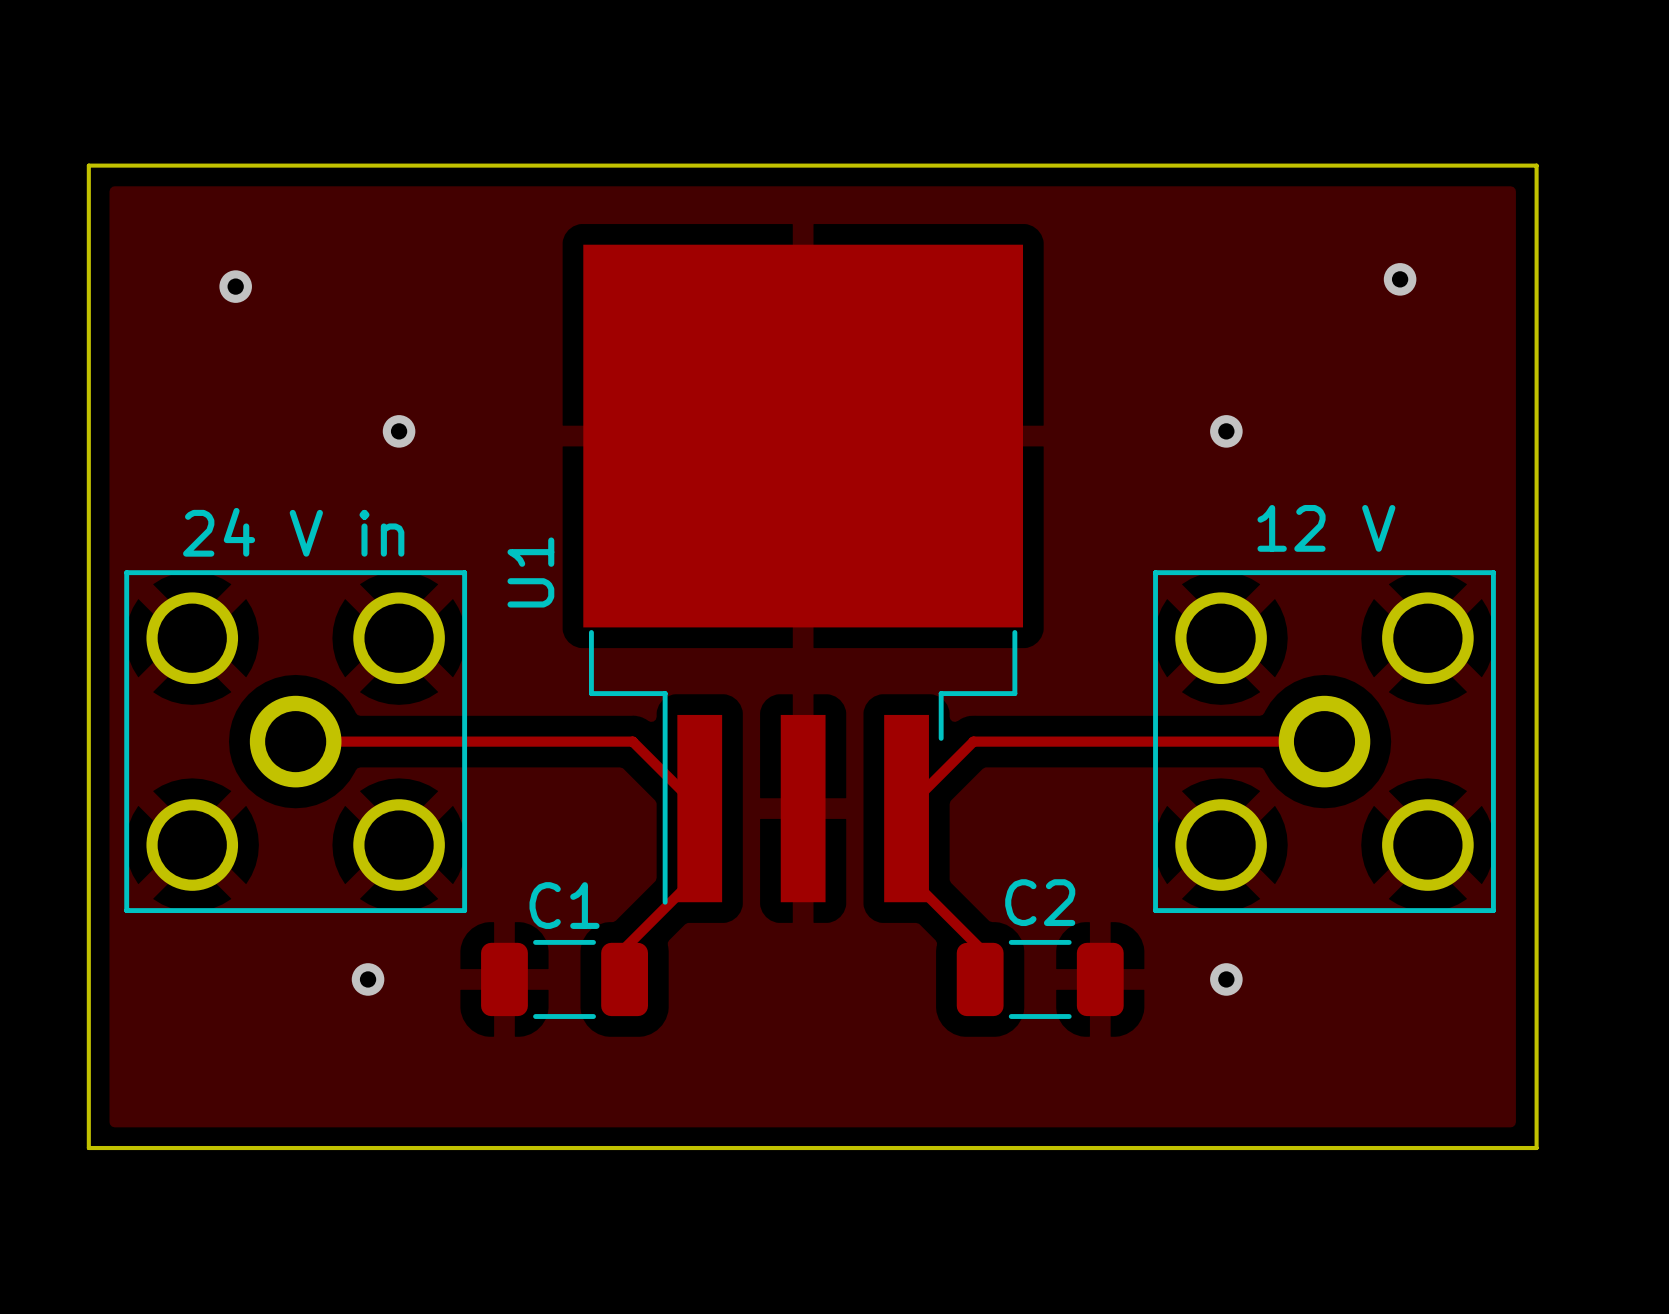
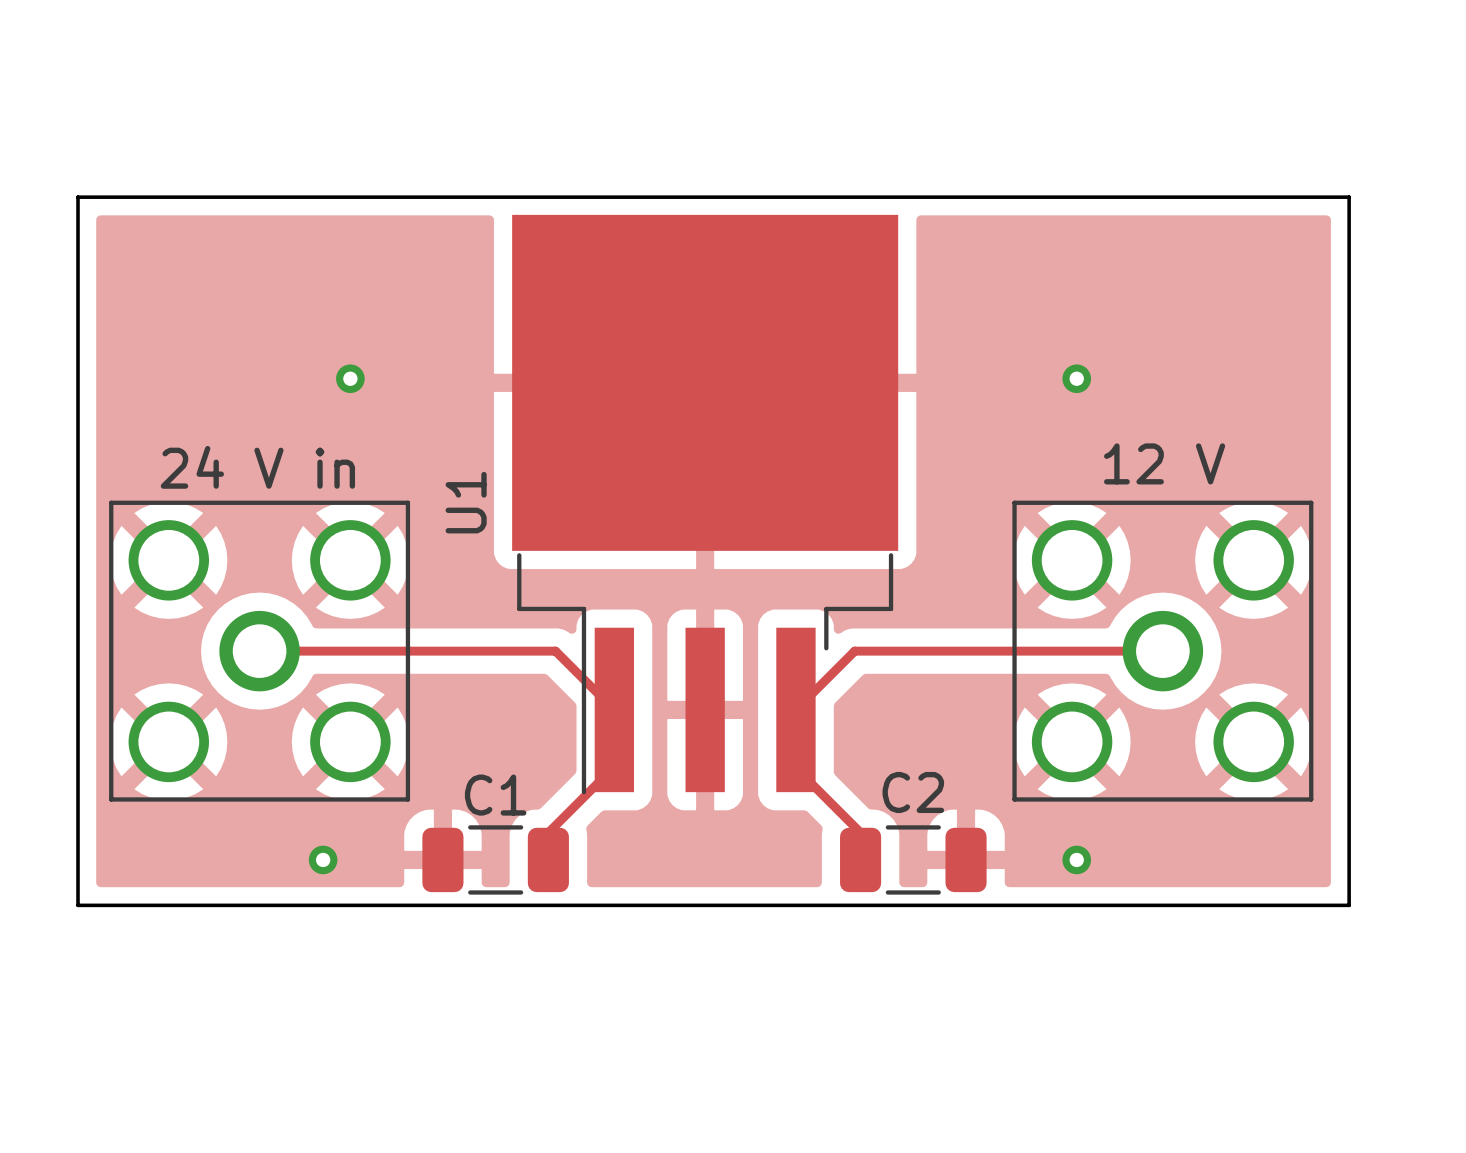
board edge: (88, 224) (88, 165) (1536, 165) (1536, 224) -> (78, 197) (1349, 197)
via: (1400, 279) -> none
via: (235, 286) -> none
board edge: (88, 1031) (88, 1148) (1536, 1148) (1536, 1031) -> (78, 905) (1349, 905)

